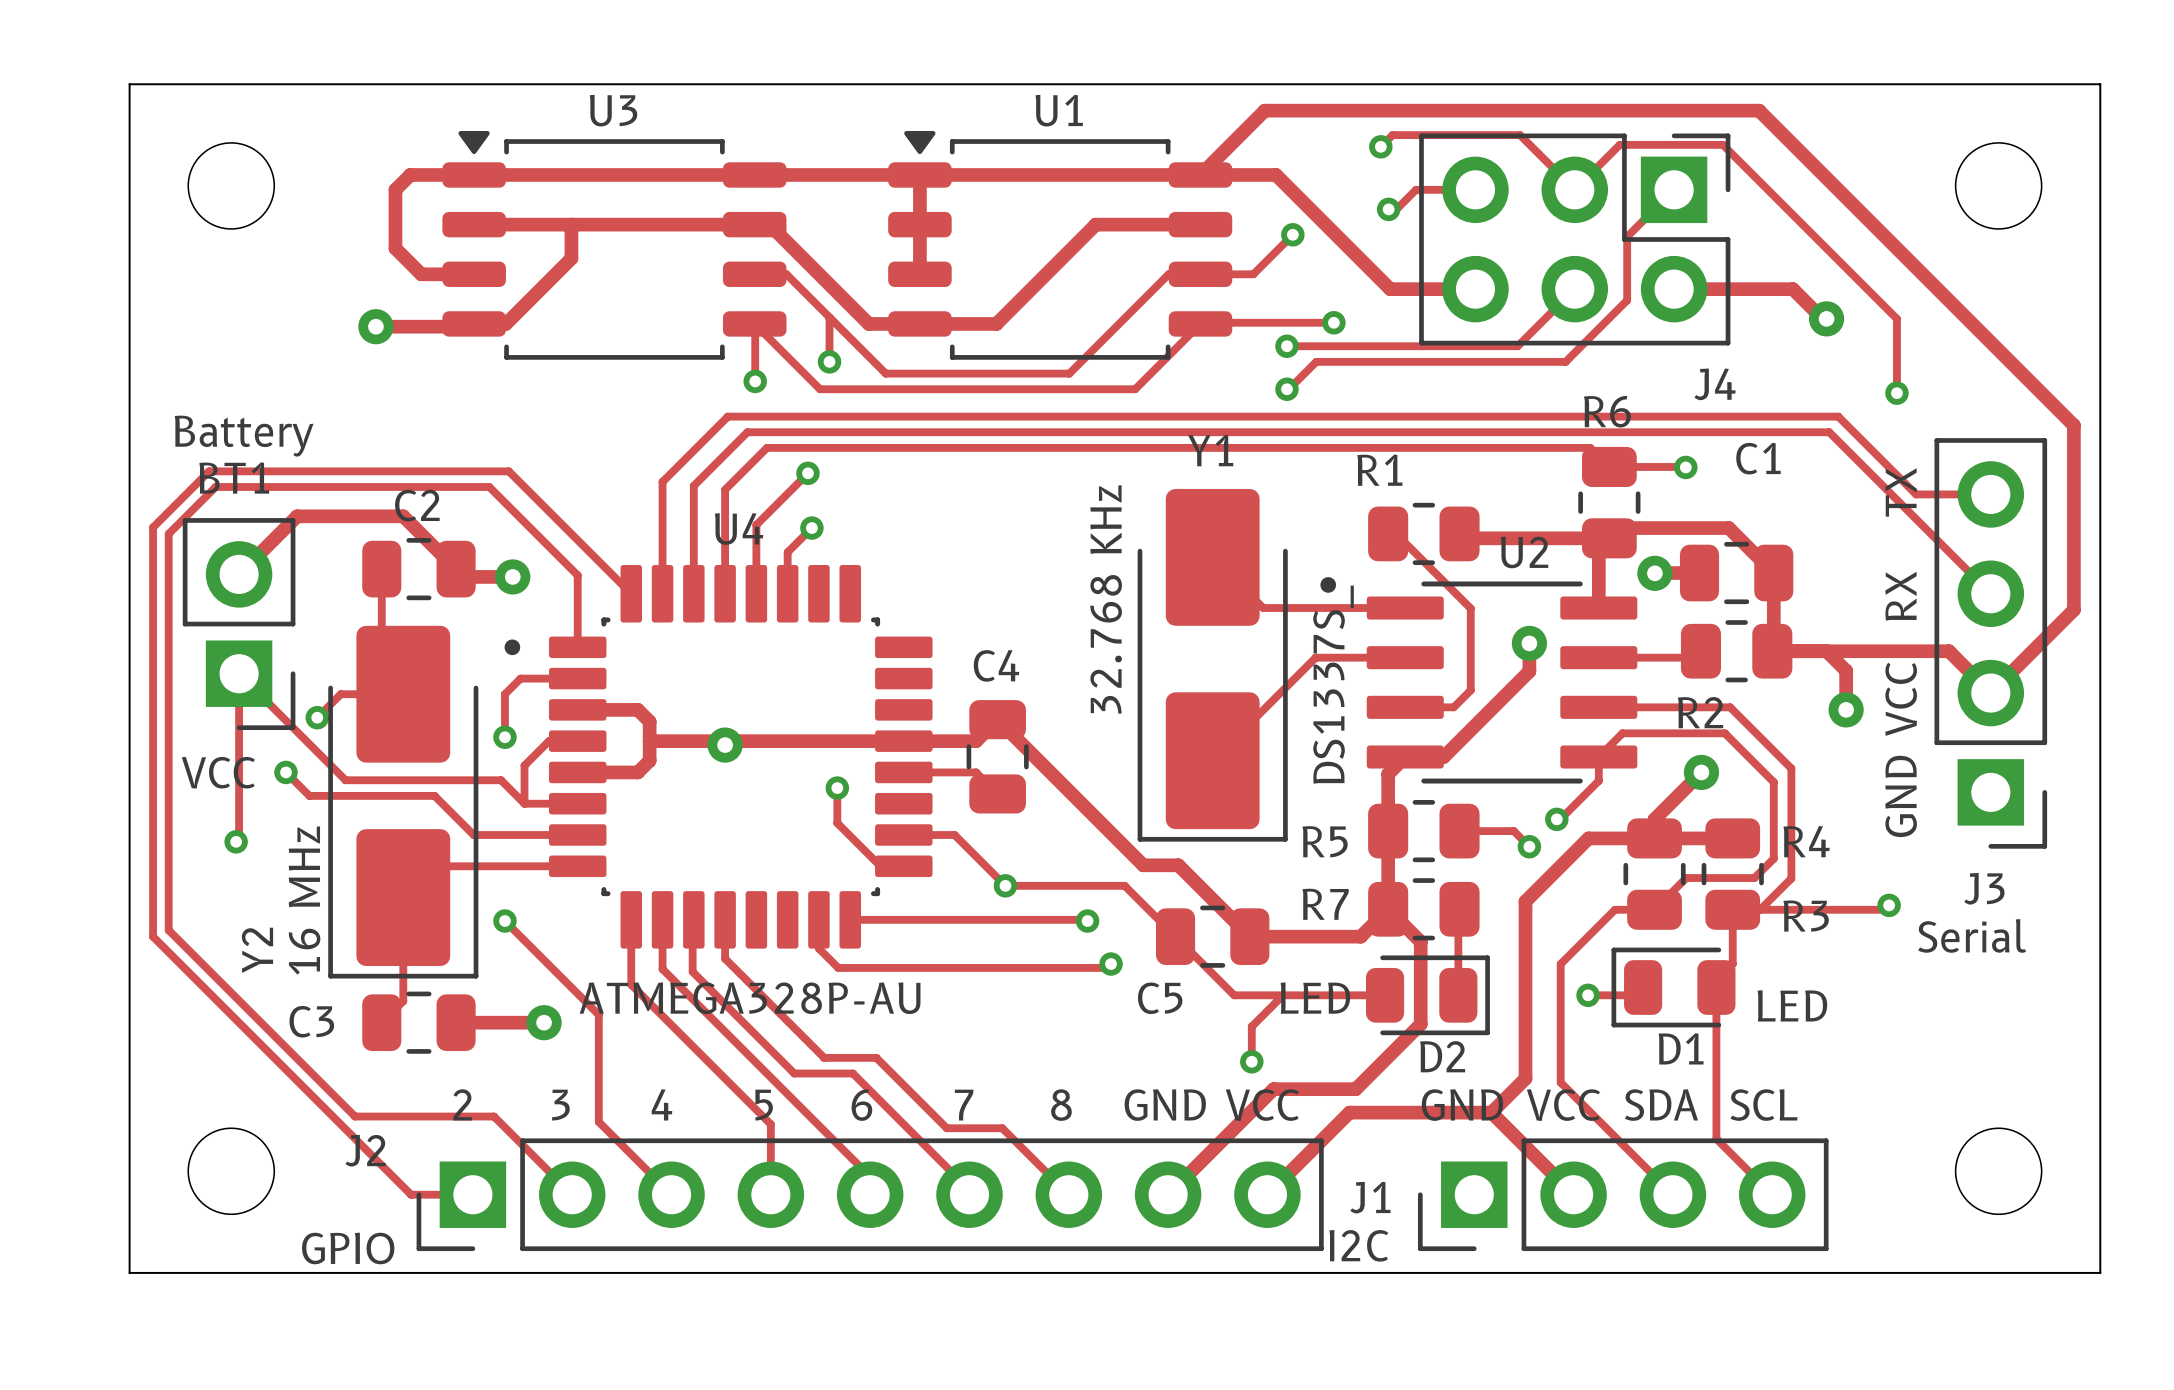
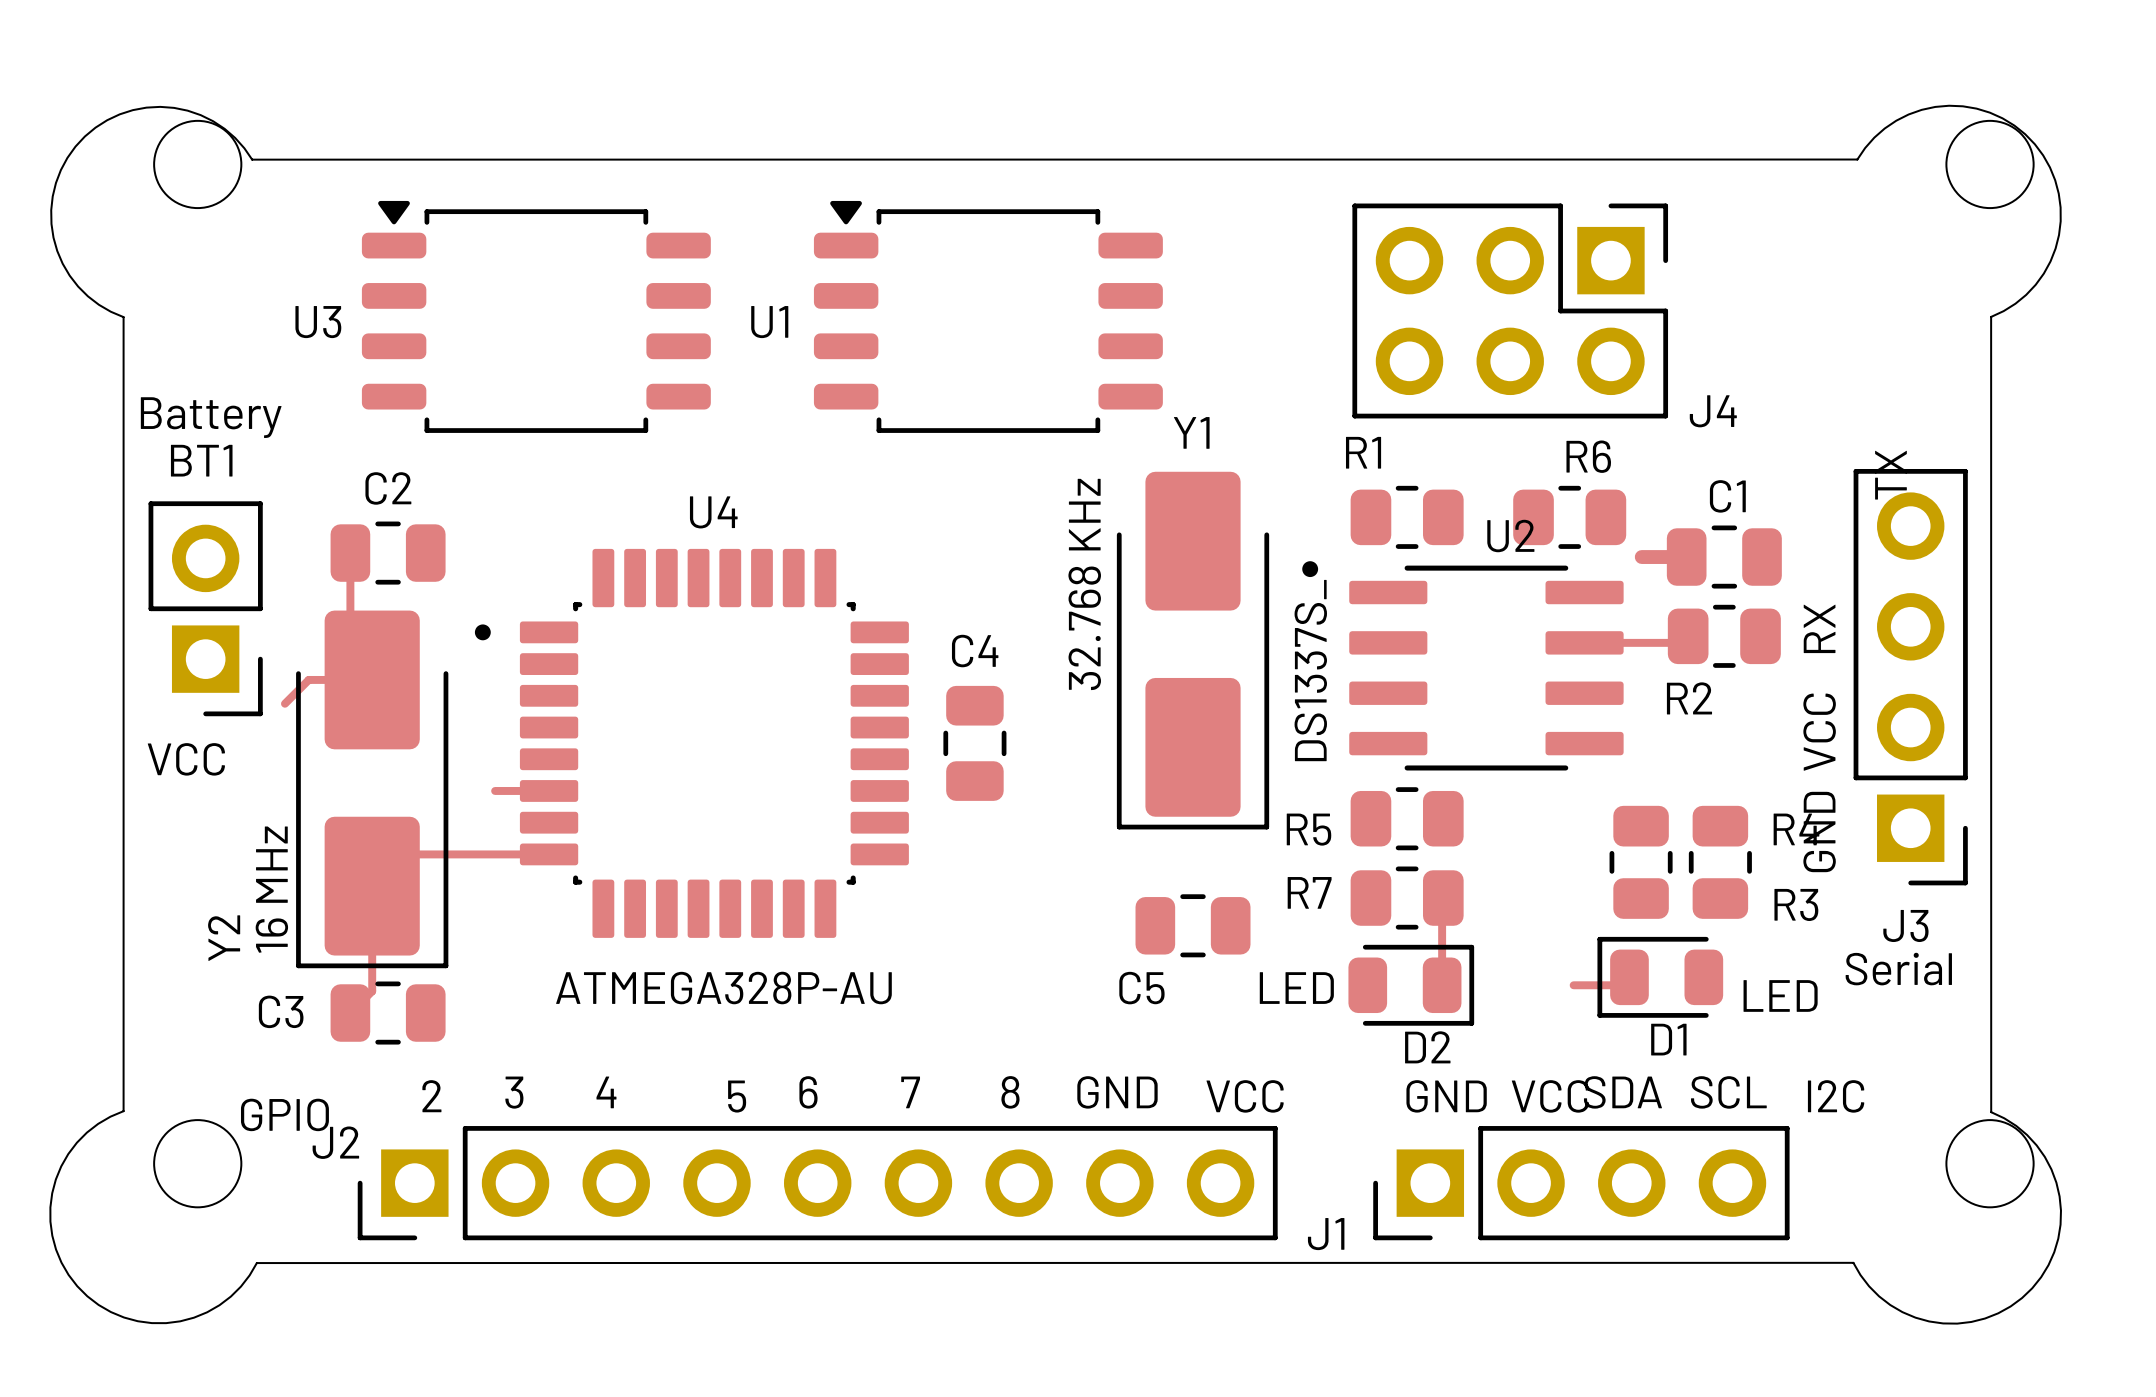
board edge: (129, 84) (2100, 84) (2100, 1272) (129, 1272) (129, 84) -> (1991, 1112) (1991, 316) (2015, 303) (2035, 284) (2050, 261) (2059, 235) (2060, 221) (2058, 193) (2049, 167) (2034, 144) (2014, 125) (2002, 118) (1989, 112) (1962, 106) (1949, 105) (1921, 109) (1896, 120) (1884, 128) (1865, 148) (1857, 159) (252, 159) (235, 137) (213, 121) (187, 110) (160, 106) (132, 110) (107, 120) (84, 136) (67, 157) (60, 170) (52, 196) (51, 223) (53, 237) (62, 263) (78, 286) (87, 296) (110, 311) (123, 317) (123, 1111) (98, 1123) (76, 1142) (68, 1154) (55, 1179) (52, 1193) (50, 1221) (56, 1249) (68, 1274) (87, 1296) (110, 1312) (137, 1321) (151, 1323) (166, 1323) (194, 1317) (207, 1312) (230, 1296) (240, 1286) (256, 1263) (1853, 1262) (1860, 1275) (1879, 1296) (1902, 1312) (1929, 1321) (1957, 1323) (1985, 1318) (1998, 1313) (2022, 1298) (2032, 1288) (2048, 1265) (2058, 1238) (2060, 1224) (2059, 1196) (2056, 1182) (2044, 1156) (2027, 1134) (2016, 1125) (1991, 1112)
U3 name position: U3 (613, 110) -> U3 (318, 322)
U1 name position: U1 (1059, 110) -> U1 (769, 322)
track: (1380, 146) (1392, 135) (1520, 135) (1574, 189) (1619, 144) (1722, 144) (1896, 318) (1896, 393) -> none
via: (1380, 146) -> none
track: (919, 174) (919, 274) -> none
track: (1200, 174) (1264, 110) (1759, 110) (2073, 425) (2073, 609) (1990, 693) (1948, 651) (1772, 651) -> none
track: (1475, 189) (1416, 189) (1396, 209) (1388, 209) -> none
track: (1674, 189) (1627, 236) (1627, 300) (1565, 361) (1316, 361) (1286, 389) -> none
via: (1388, 209) -> none
track: (474, 224) (769, 224) (868, 323) (996, 323) (1095, 224) (1200, 224) -> none
track: (571, 224) (571, 258) (505, 323) (474, 323) (471, 326) (375, 326) -> none
track: (1292, 234) (1253, 274) (1168, 274) (1069, 373) (885, 373) (830, 318) -> none
via: (1292, 234) -> none
J4 position: (1574, 239) -> (1510, 310)
U3 position: (614, 245) -> (536, 316)
U1 position: (1060, 245) -> (988, 316)
track: (474, 274) (421, 274) (395, 248) (395, 189) (410, 174) (1276, 174) (1390, 289) (1475, 289) -> none
track: (754, 274) (786, 274) (830, 318) -> none
track: (1574, 289) (1517, 346) (1286, 346) -> none
track: (1674, 289) (1792, 289) (1822, 318) (1826, 318) -> none
track: (830, 318) (829, 361) -> none
via: (1826, 318) -> none
track: (1333, 322) (1201, 322) (1135, 389) (820, 389) (754, 323) -> none
via: (1333, 322) -> none
track: (755, 324) (755, 381) -> none
via: (375, 326) -> none
via: (1286, 346) -> none
via: (829, 361) -> none
via: (755, 381) -> none
J4 name position: J4 (1715, 384) -> J4 (1713, 411)
via: (1286, 389) -> none
via: (1896, 393) -> none
C1 name position: C1 (1758, 458) -> C1 (1727, 496)
track: (1685, 466) (1609, 466) (1590, 447) (766, 447) (725, 489) (725, 593) -> none
via: (1685, 467) -> none
track: (808, 473) (756, 524) (756, 593) -> none
via: (808, 473) -> none
track: (1990, 494) (1916, 494) (1838, 416) (727, 416) (662, 481) (662, 593) -> none
R6 rotation: 0° (1609, 502) -> 90° clockwise (1569, 517)
track: (811, 528) (787, 552) (787, 593) -> none
via: (811, 528) -> none
track: (1388, 533) (1396, 533) (1470, 608) (1470, 690) (1453, 707) (1405, 707) -> none
track: (1459, 533) (1463, 538) (1609, 538) -> none
track: (1212, 557) (1263, 608) (1405, 608) -> none
via: (1654, 573) -> none
track: (239, 574) (297, 516) (403, 516) (463, 576) (512, 576) -> none
via: (512, 576) -> none
track: (631, 593) (508, 471) (209, 471) (153, 527) (153, 936) (411, 1194) (472, 1194) -> none
track: (693, 593) (693, 485) (747, 432) (1829, 432) (1990, 593) -> none
text position: RX (1900, 596) -> RX (1819, 628)
track: (1598, 608) (1598, 548) (1619, 528) (1728, 528) (1773, 573) (1772, 651) -> none
track: (1529, 635) (1529, 671) (1443, 756) (1405, 756) (1388, 774) (1388, 909) -> none
via: (1529, 643) -> none
J3 position: (1990, 643) -> (1910, 677)
track: (577, 647) (577, 575) (489, 487) (215, 487) (168, 533) (168, 930) (355, 1116) (494, 1116) (572, 1194) -> none
track: (1826, 651) (1846, 670) (1846, 709) -> none
track: (1405, 657) (1315, 657) (1212, 760) -> none
track: (577, 678) (520, 678) (504, 694) (504, 737) -> none
text position: VCC (1901, 699) -> VCC (1819, 732)
track: (1598, 707) (1730, 707) (1791, 768) (1791, 878) (1760, 909) -> none
track: (577, 709) (637, 709) (649, 721) (649, 760) (637, 772) (577, 772) -> none
via: (1846, 709) -> none
via: (317, 717) -> none
via: (504, 737) -> none
track: (577, 741) (548, 741) (524, 765) (524, 803) (501, 780) (345, 780) (239, 673) (239, 838) (236, 841) -> none
track: (649, 741) (721, 741) (725, 745) (729, 741) (976, 741) (997, 719) (1143, 865) (1178, 865) (1249, 936) (1360, 936) (1388, 909) -> none
via: (725, 745) -> none
track: (286, 772) (309, 795) (434, 795) (473, 835) (577, 835) -> none
via: (286, 772) -> none
track: (903, 772) (976, 772) (997, 793) -> none
track: (1701, 772) (1654, 819) (1654, 838) -> none
via: (1701, 772) -> none
track: (837, 788) (837, 823) (880, 866) (903, 866) -> none
via: (837, 788) -> none
text position: GND (1901, 796) -> GND (1819, 832)
track: (1556, 819) (1560, 819) (1598, 780) (1598, 756) (1622, 733) (1724, 733) (1773, 782) (1773, 858) (1754, 878) (1686, 878) (1654, 909) (1614, 909) (1560, 964) (1560, 1082) (1672, 1194) -> none
via: (1556, 819) -> none
track: (1459, 831) (1513, 831) (1529, 846) -> none
track: (903, 835) (954, 835) (1005, 885) (1124, 885) (1234, 995) (1385, 995) -> none
track: (1732, 838) (1588, 838) (1525, 901) (1525, 1078) (1491, 1112) -> none
via: (236, 841) -> none
via: (1529, 846) -> none
via: (1005, 885) -> none
track: (1889, 905) (1884, 909) (1732, 909) (1732, 964) (1716, 980) (1716, 1138) (1772, 1194) -> none
via: (1889, 905) -> none
track: (1388, 909) (1420, 941) (1420, 1024) (1355, 1089) (1273, 1089) (1168, 1194) -> none
track: (631, 919) (631, 984) (770, 1124) (770, 1194) -> none
track: (662, 919) (662, 969) (870, 1176) (870, 1194) -> none
track: (725, 919) (725, 958) (824, 1057) (876, 1057) (946, 1128) (1002, 1128) (1068, 1194) -> none
track: (818, 919) (818, 948) (838, 967) (1107, 967) (1111, 964) -> none
track: (850, 919) (1087, 921) -> none
track: (504, 921) (598, 1014) (598, 1122) (671, 1194) -> none
via: (504, 921) -> none
via: (1087, 921) -> none
track: (692, 926) (692, 971) (794, 1073) (852, 1073) (969, 1190) (969, 1194) -> none
text position: Serial (1972, 935) -> Serial (1898, 969)
via: (1111, 964) -> none
track: (1283, 995) (1251, 1026) (1251, 1061) -> none
via: (1588, 995) -> none
track: (456, 1022) (544, 1022) -> none
via: (544, 1022) -> none
via: (1251, 1061) -> none
text position: 4 (661, 1104) -> 4 (606, 1092)
text position: 3 (560, 1105) -> 3 (514, 1092)
text position: 6 (861, 1105) -> 6 (808, 1092)
text position: 7 (964, 1105) -> 7 (910, 1092)
text position: 8 (1061, 1105) -> 8 (1010, 1092)
text position: GND (1165, 1105) -> GND (1117, 1092)
text position: SDA (1661, 1105) -> SDA (1622, 1092)
text position: SCL (1764, 1105) -> SCL (1728, 1092)
track: (1491, 1112) (1349, 1112) (1267, 1194) -> none
track: (1491, 1112) (1573, 1194) -> none
J2 position: (870, 1194) -> (817, 1183)
J1 position: (1623, 1194) -> (1581, 1183)
J1 name position: J1 (1370, 1197) -> J1 (1326, 1234)
text position: I2C (1358, 1245) -> I2C (1836, 1096)
text position: GPIO (348, 1248) -> GPIO (284, 1114)

